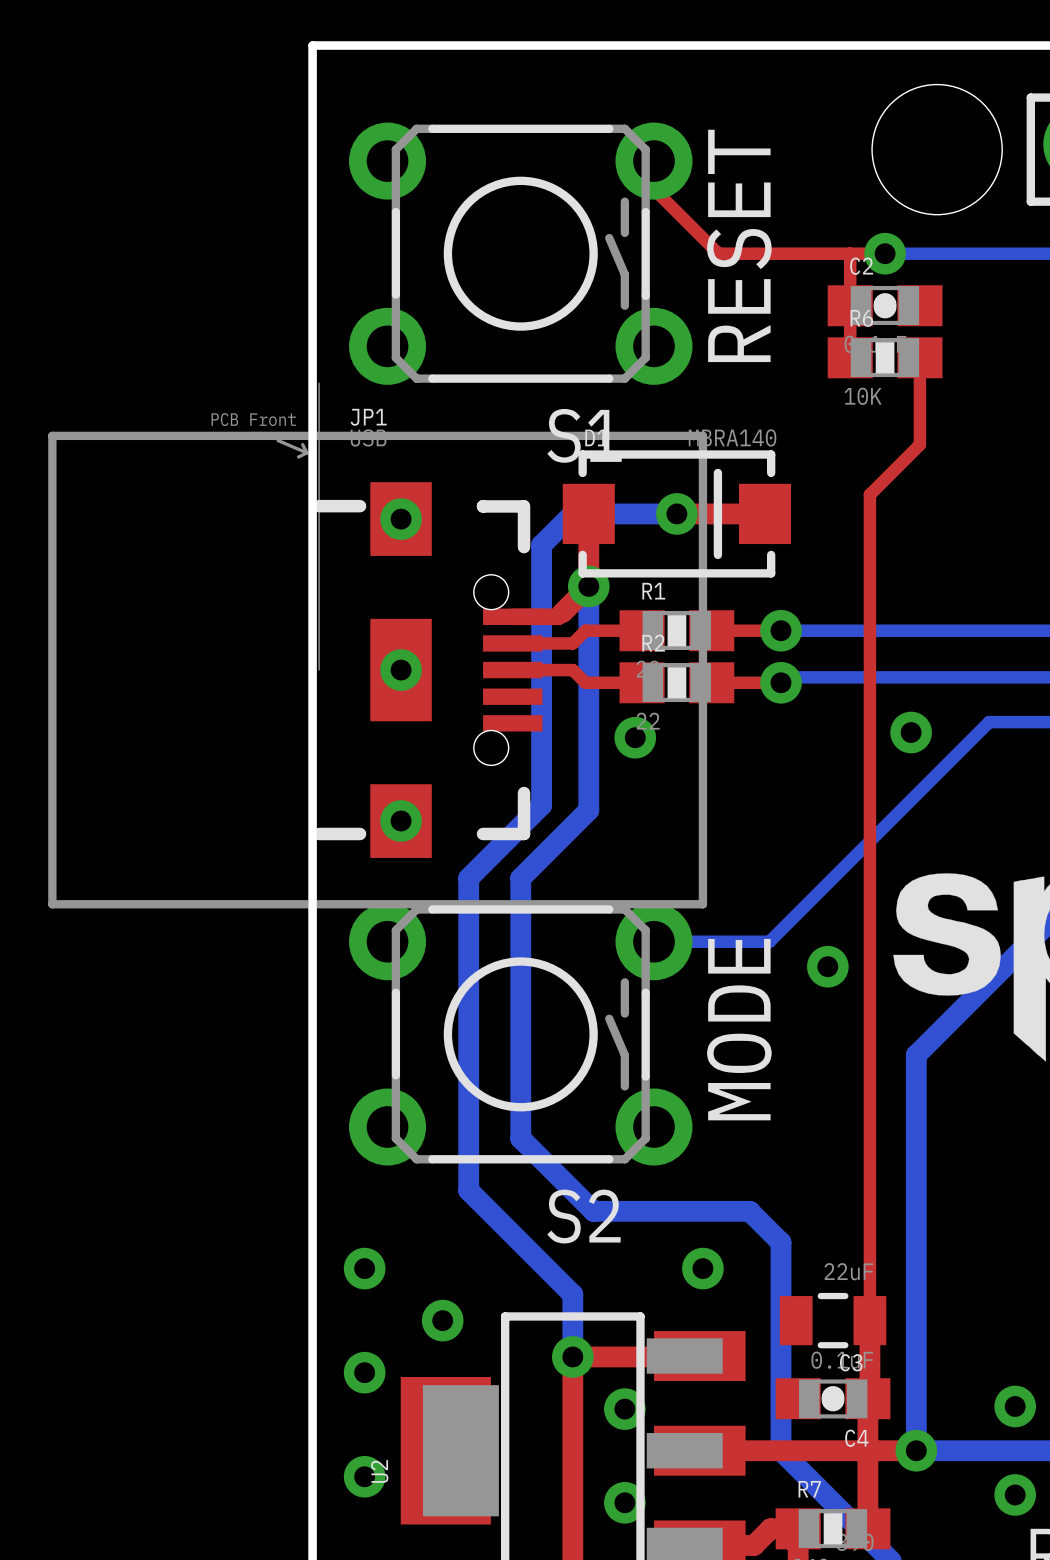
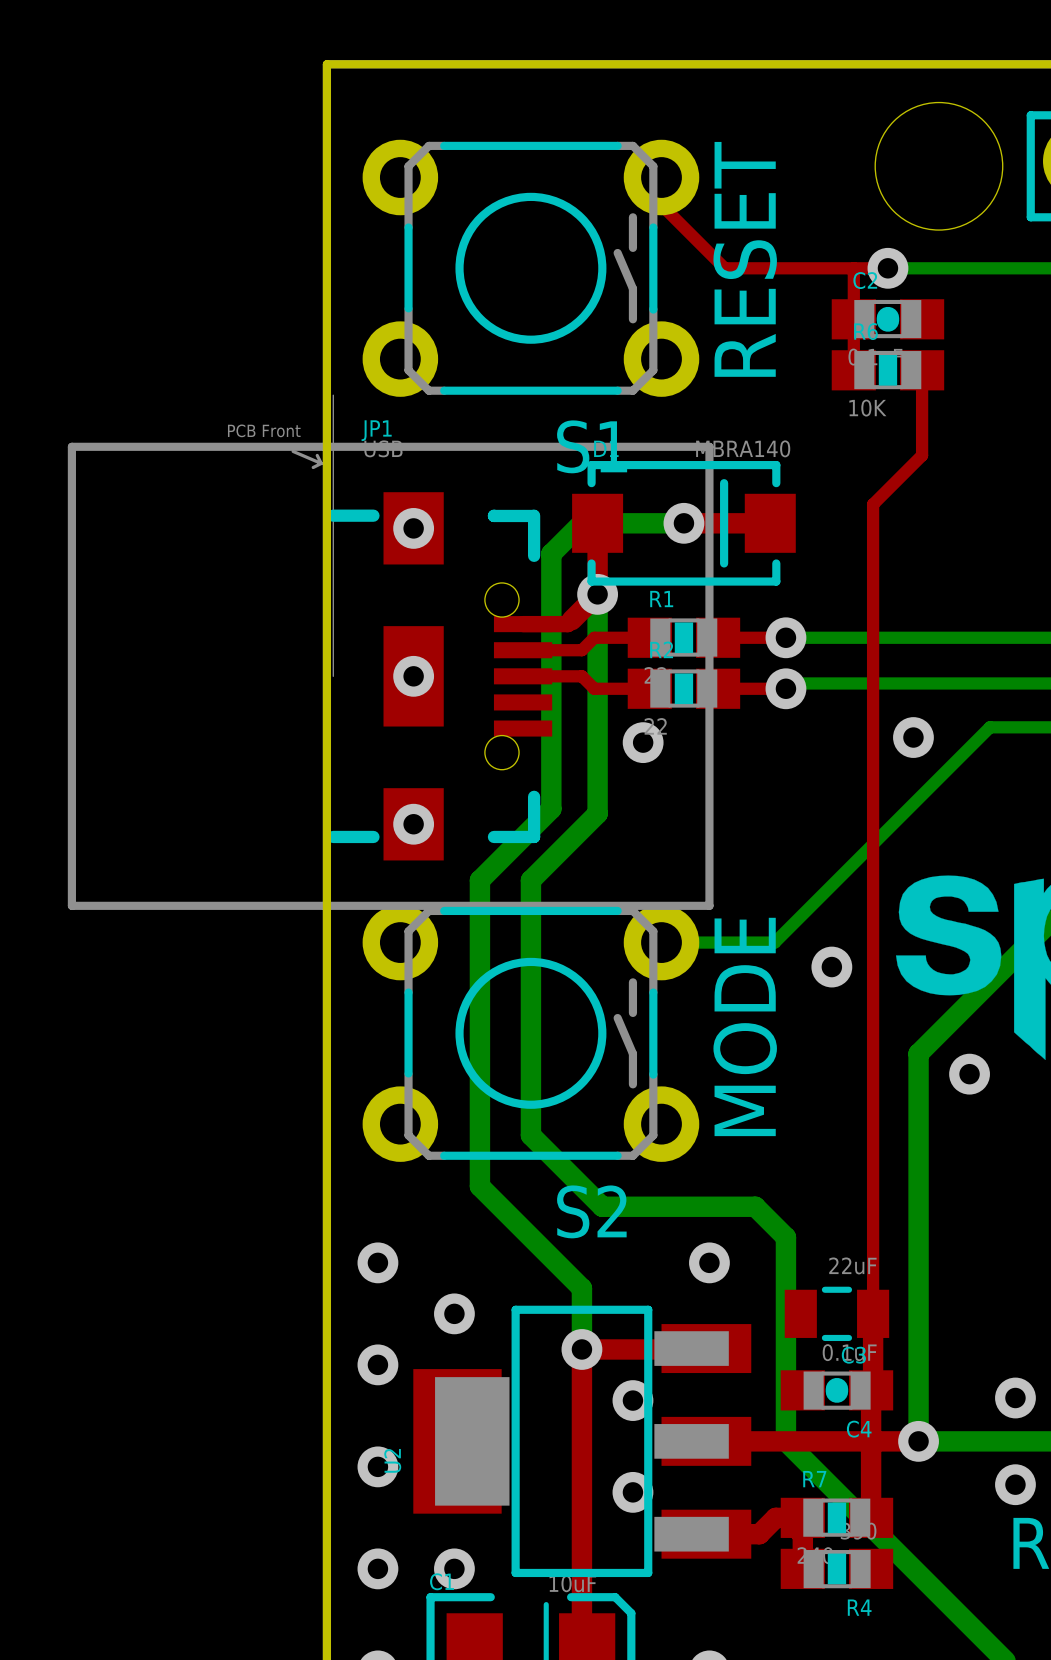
via: none -> (969, 1074)

